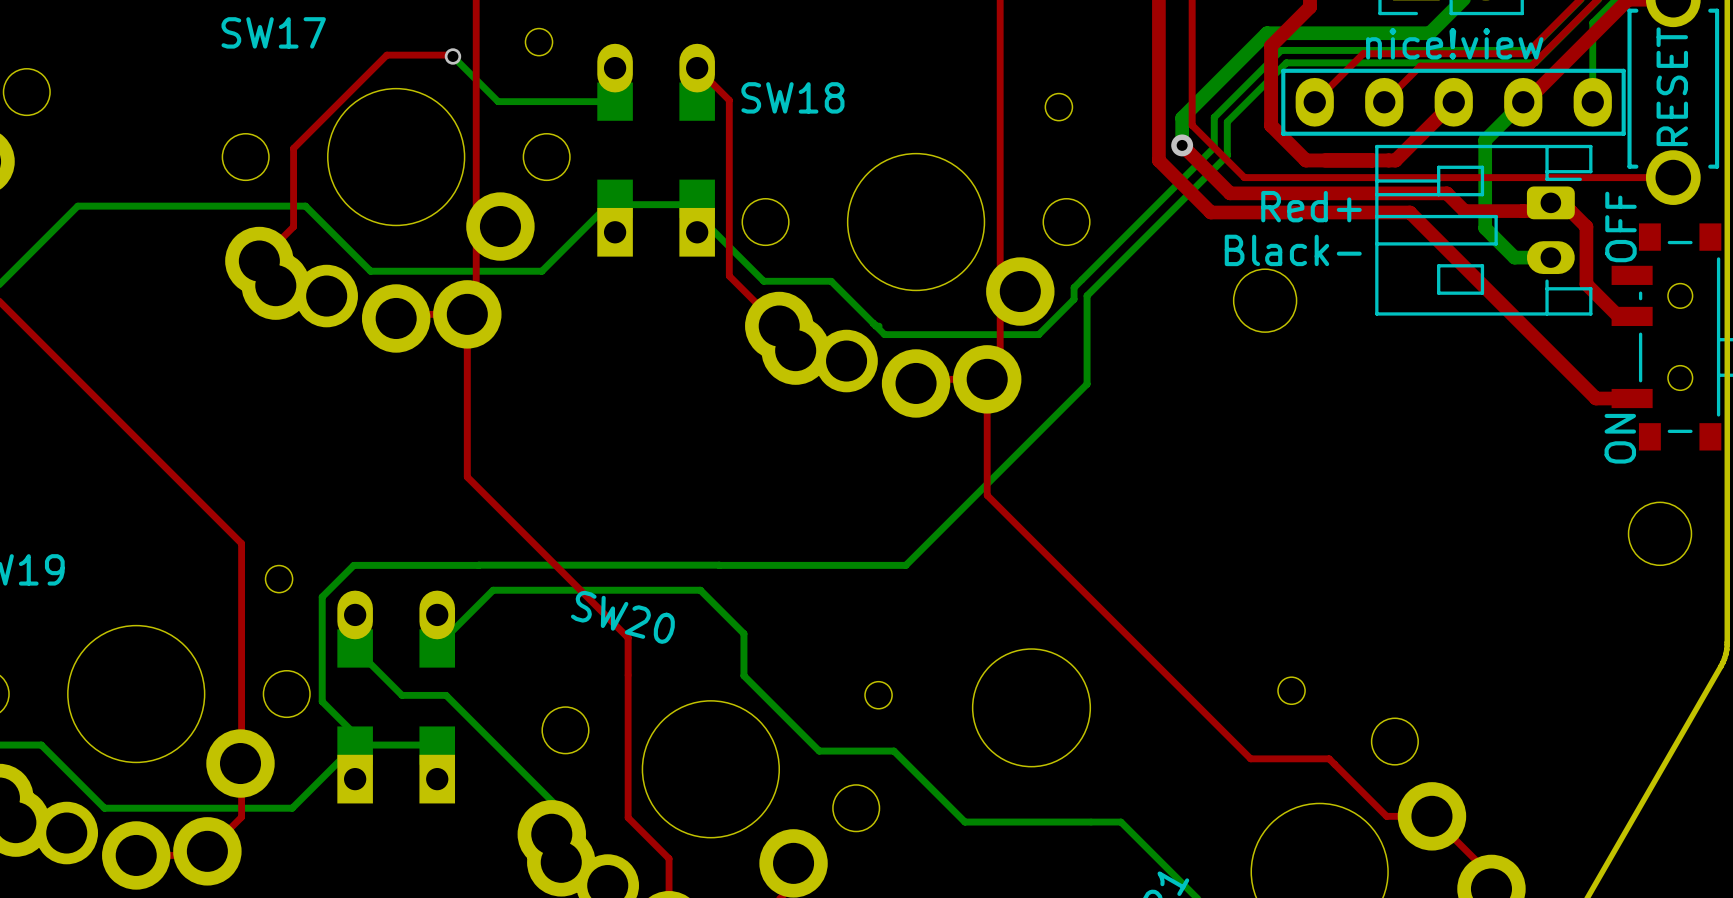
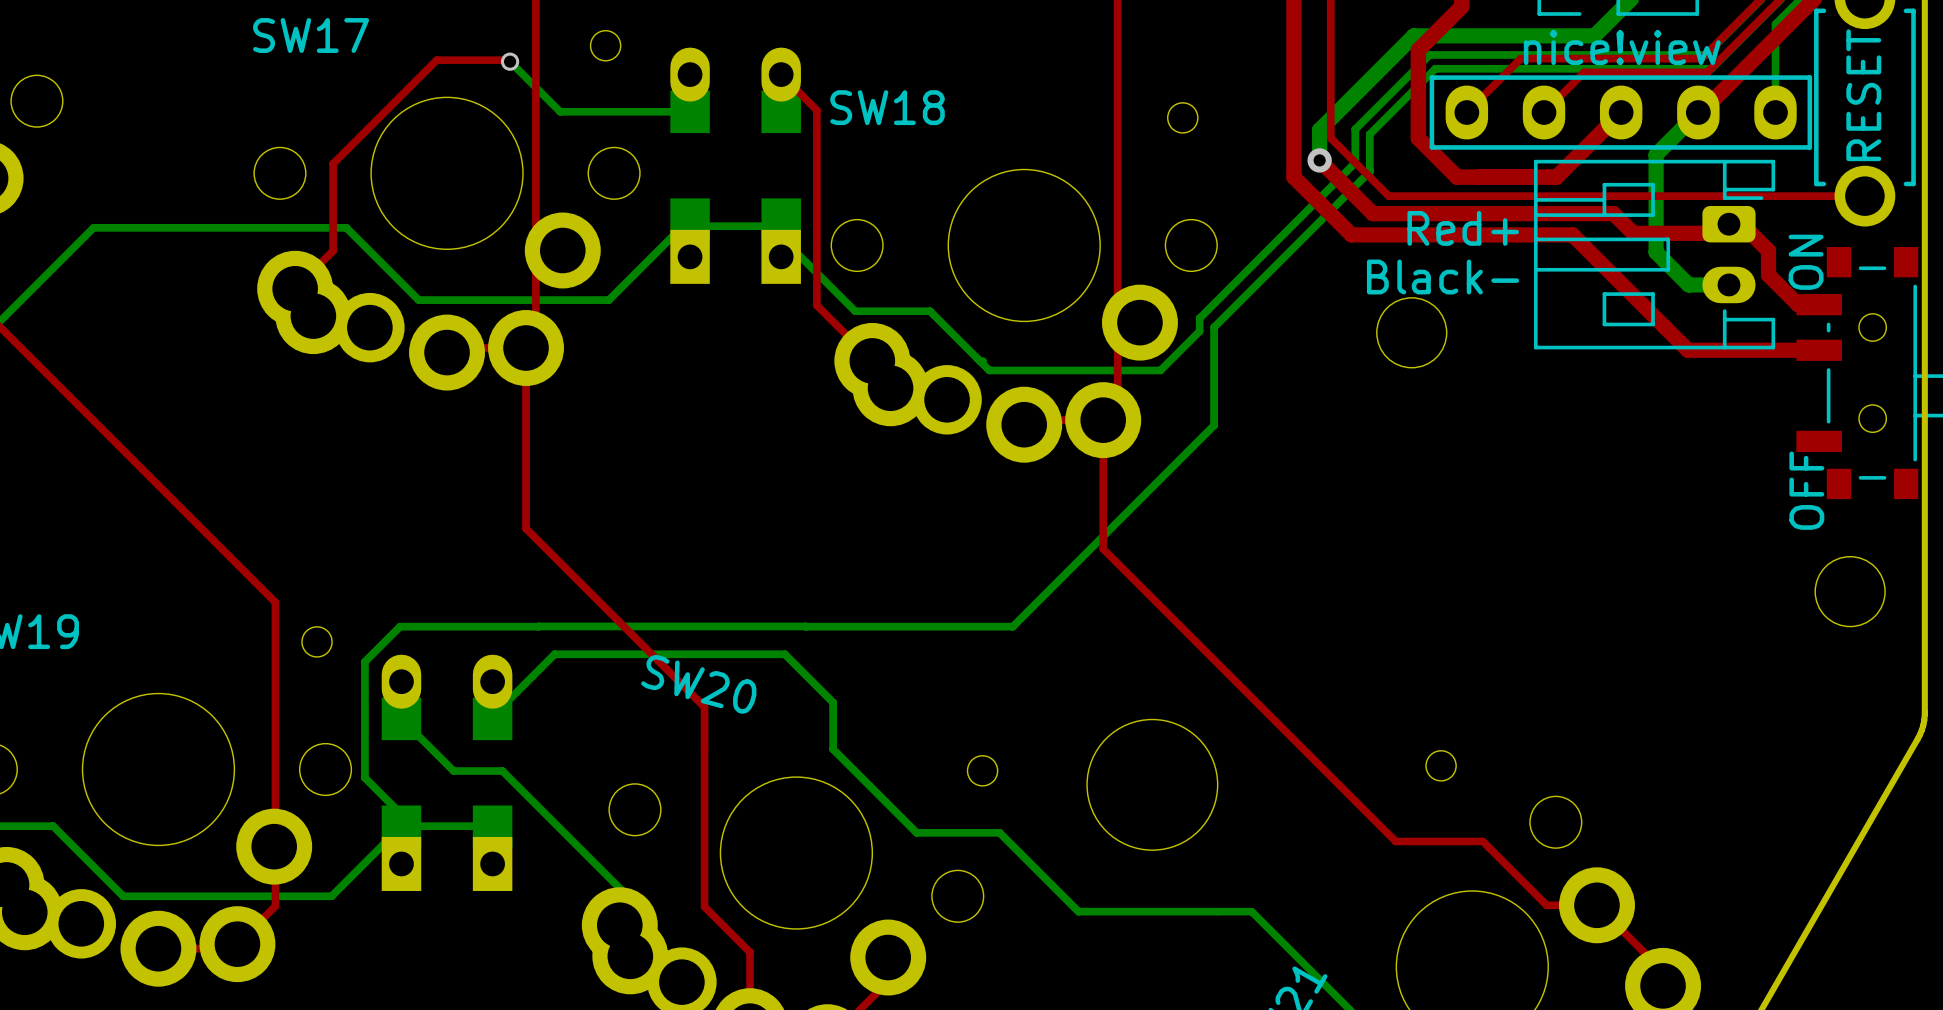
text position: OFF (1620, 226) -> OFF (1806, 490)
top track: (1586, 248) (1586, 284) (1618, 316) -> (1768, 275) (1798, 304) (1819, 304)
top track: (1513, 316) (1596, 398) (1632, 398) -> (1687, 350) (1804, 350)
text position: ON (1620, 438) -> ON (1806, 262)

